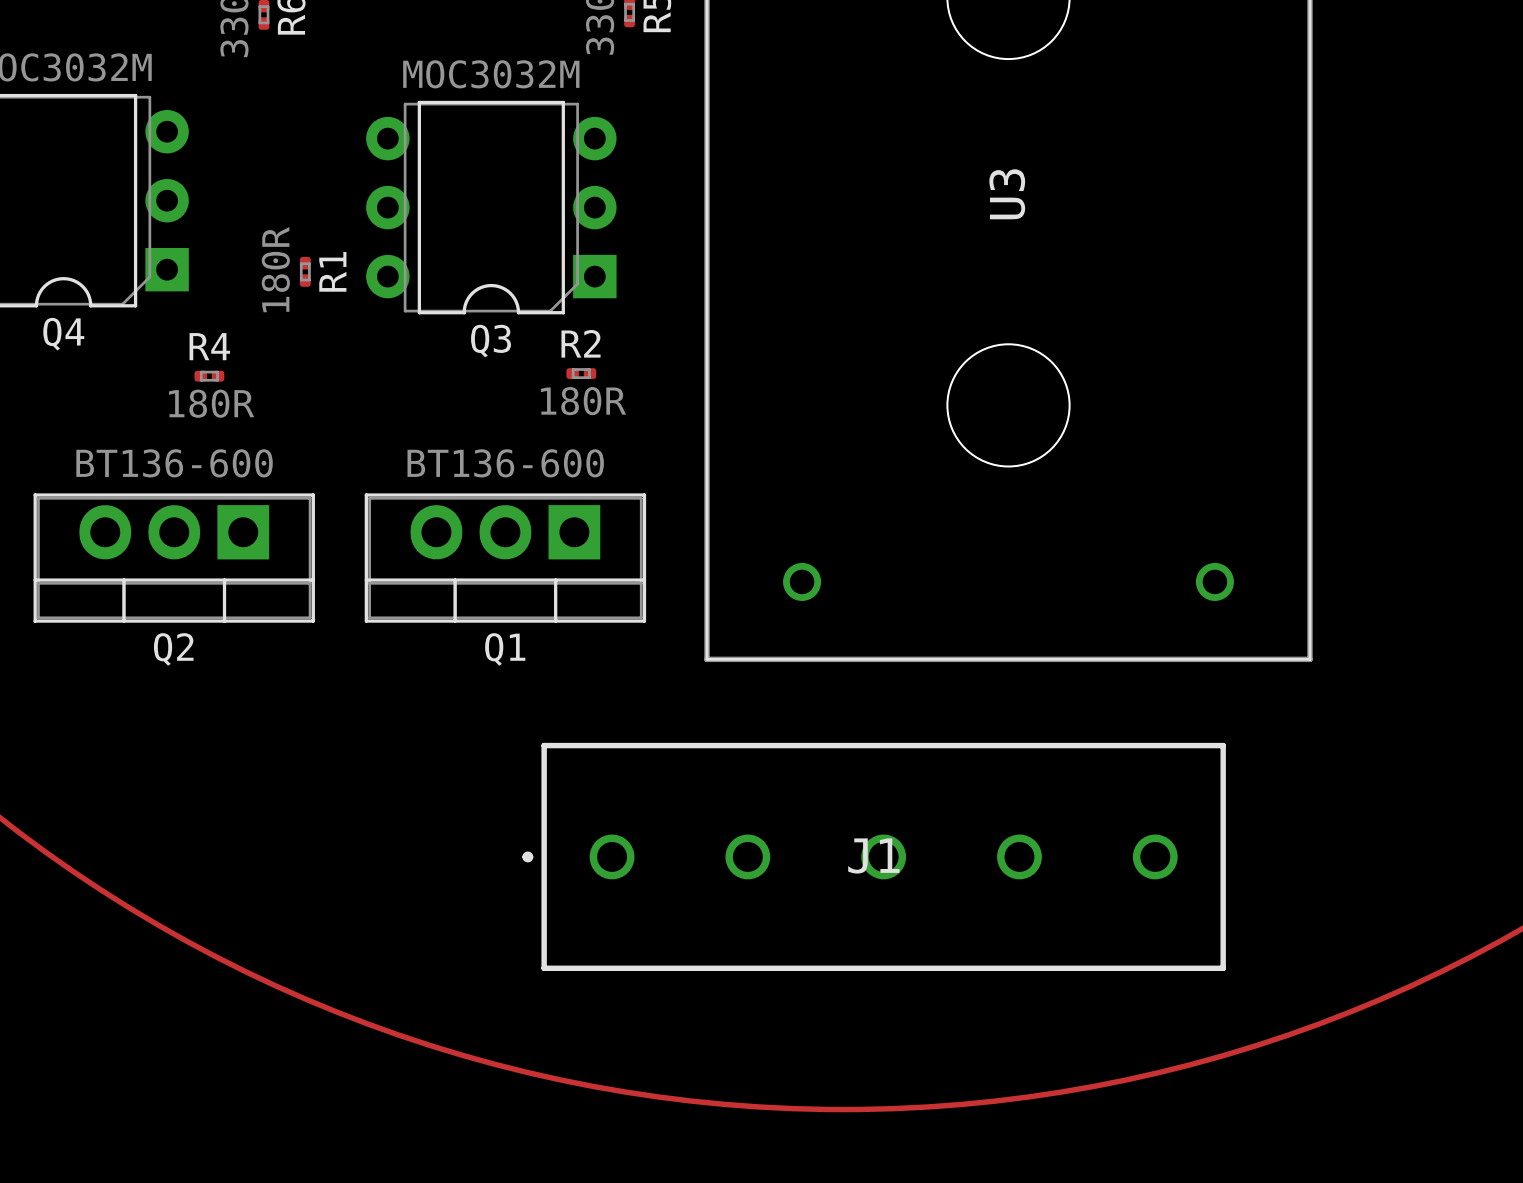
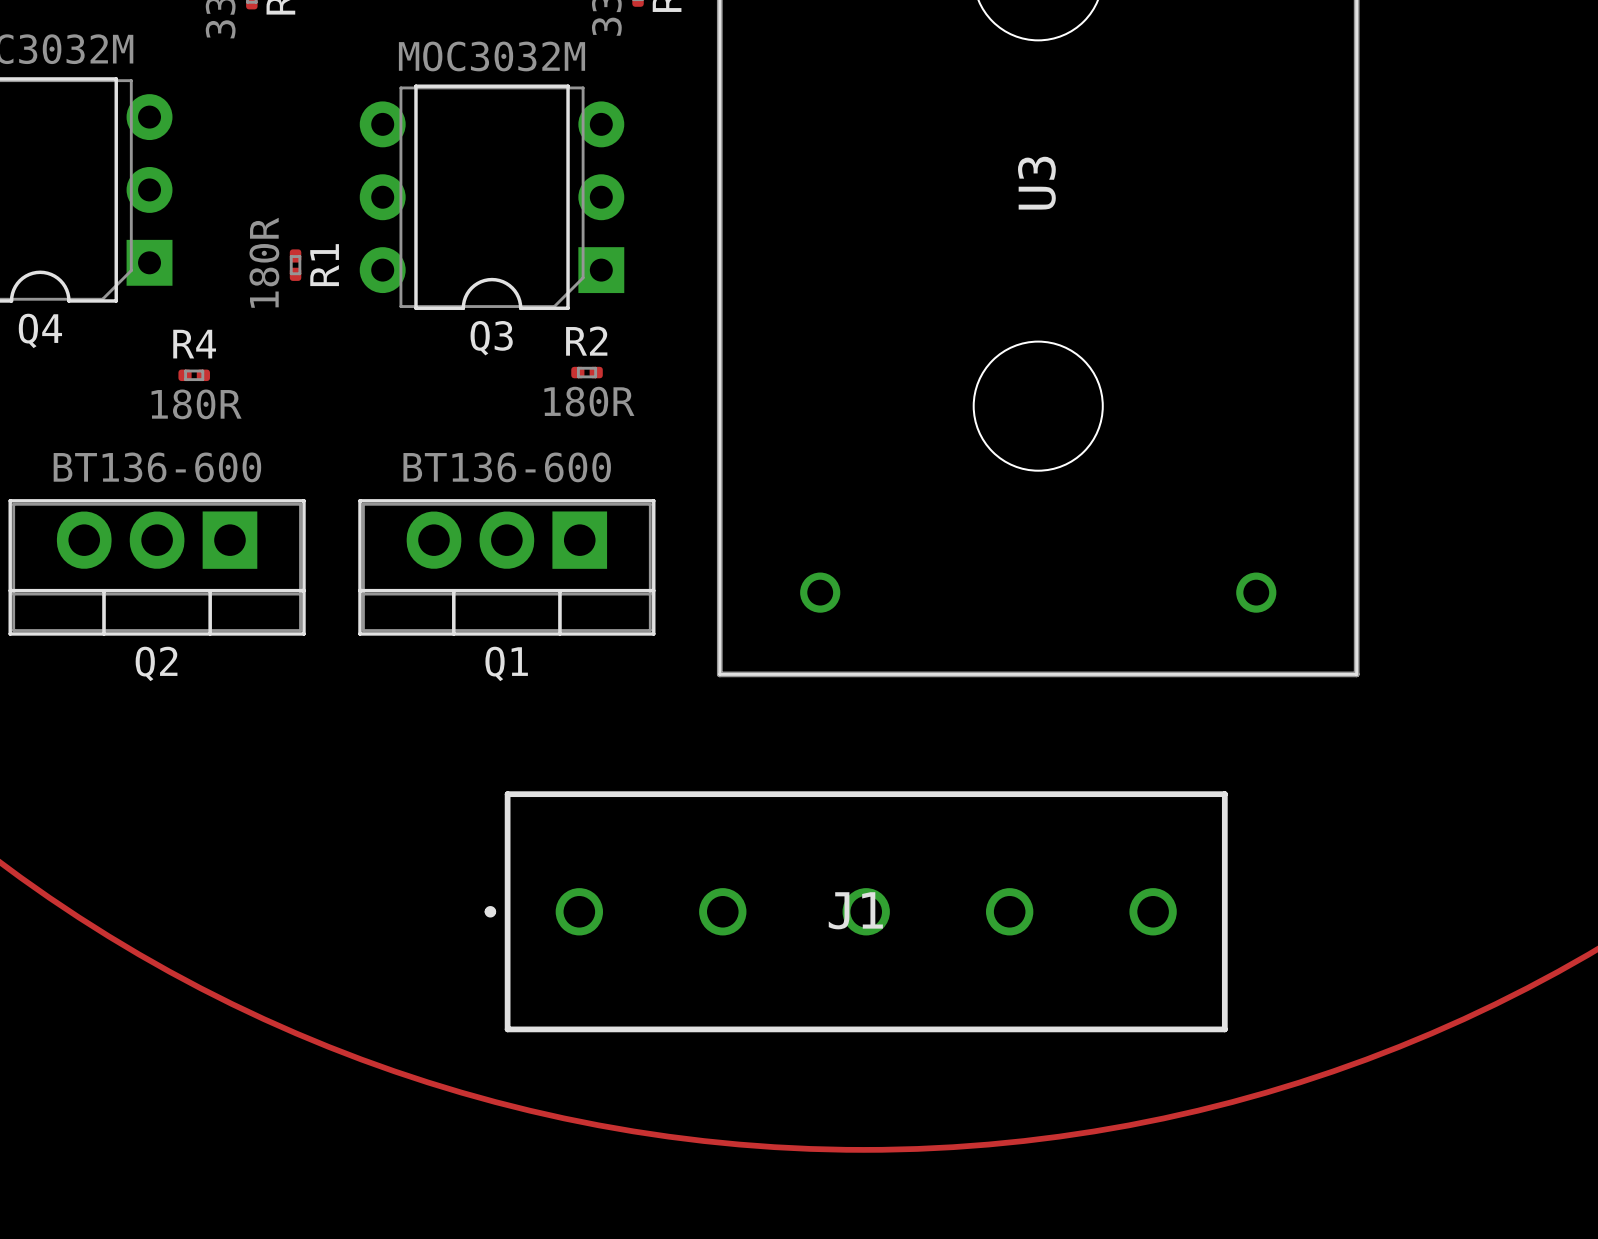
J1 position: (874, 856) -> (856, 911)

